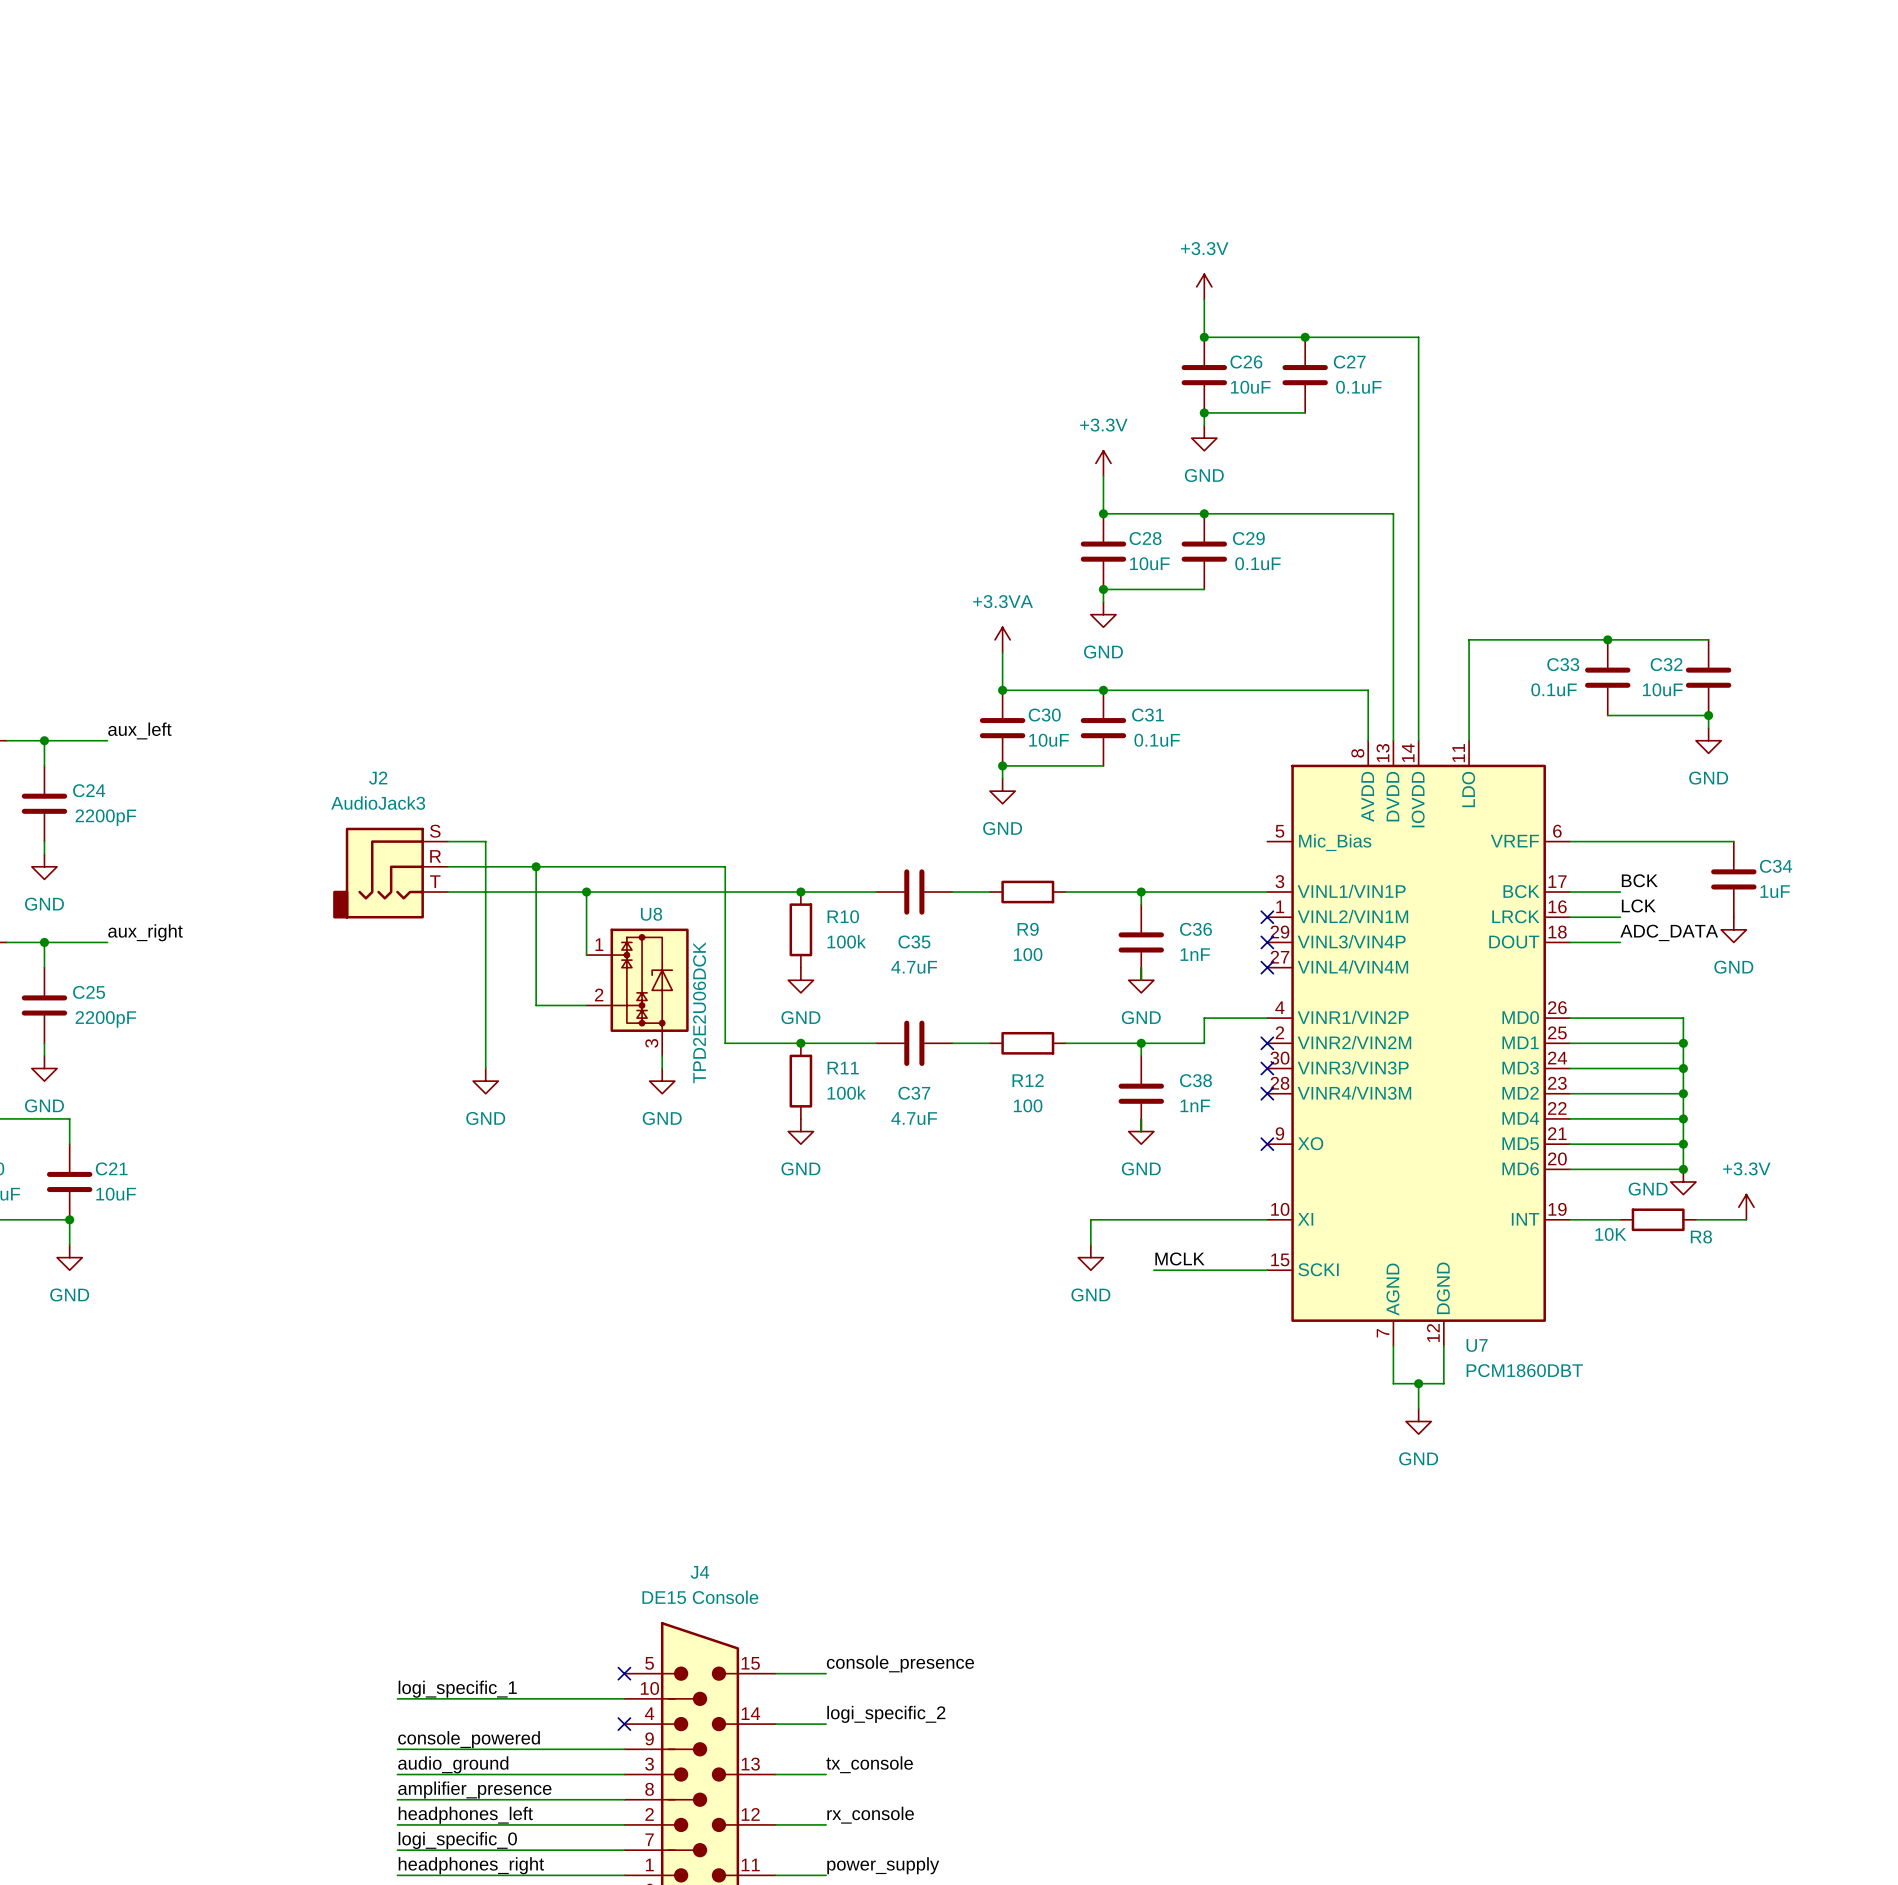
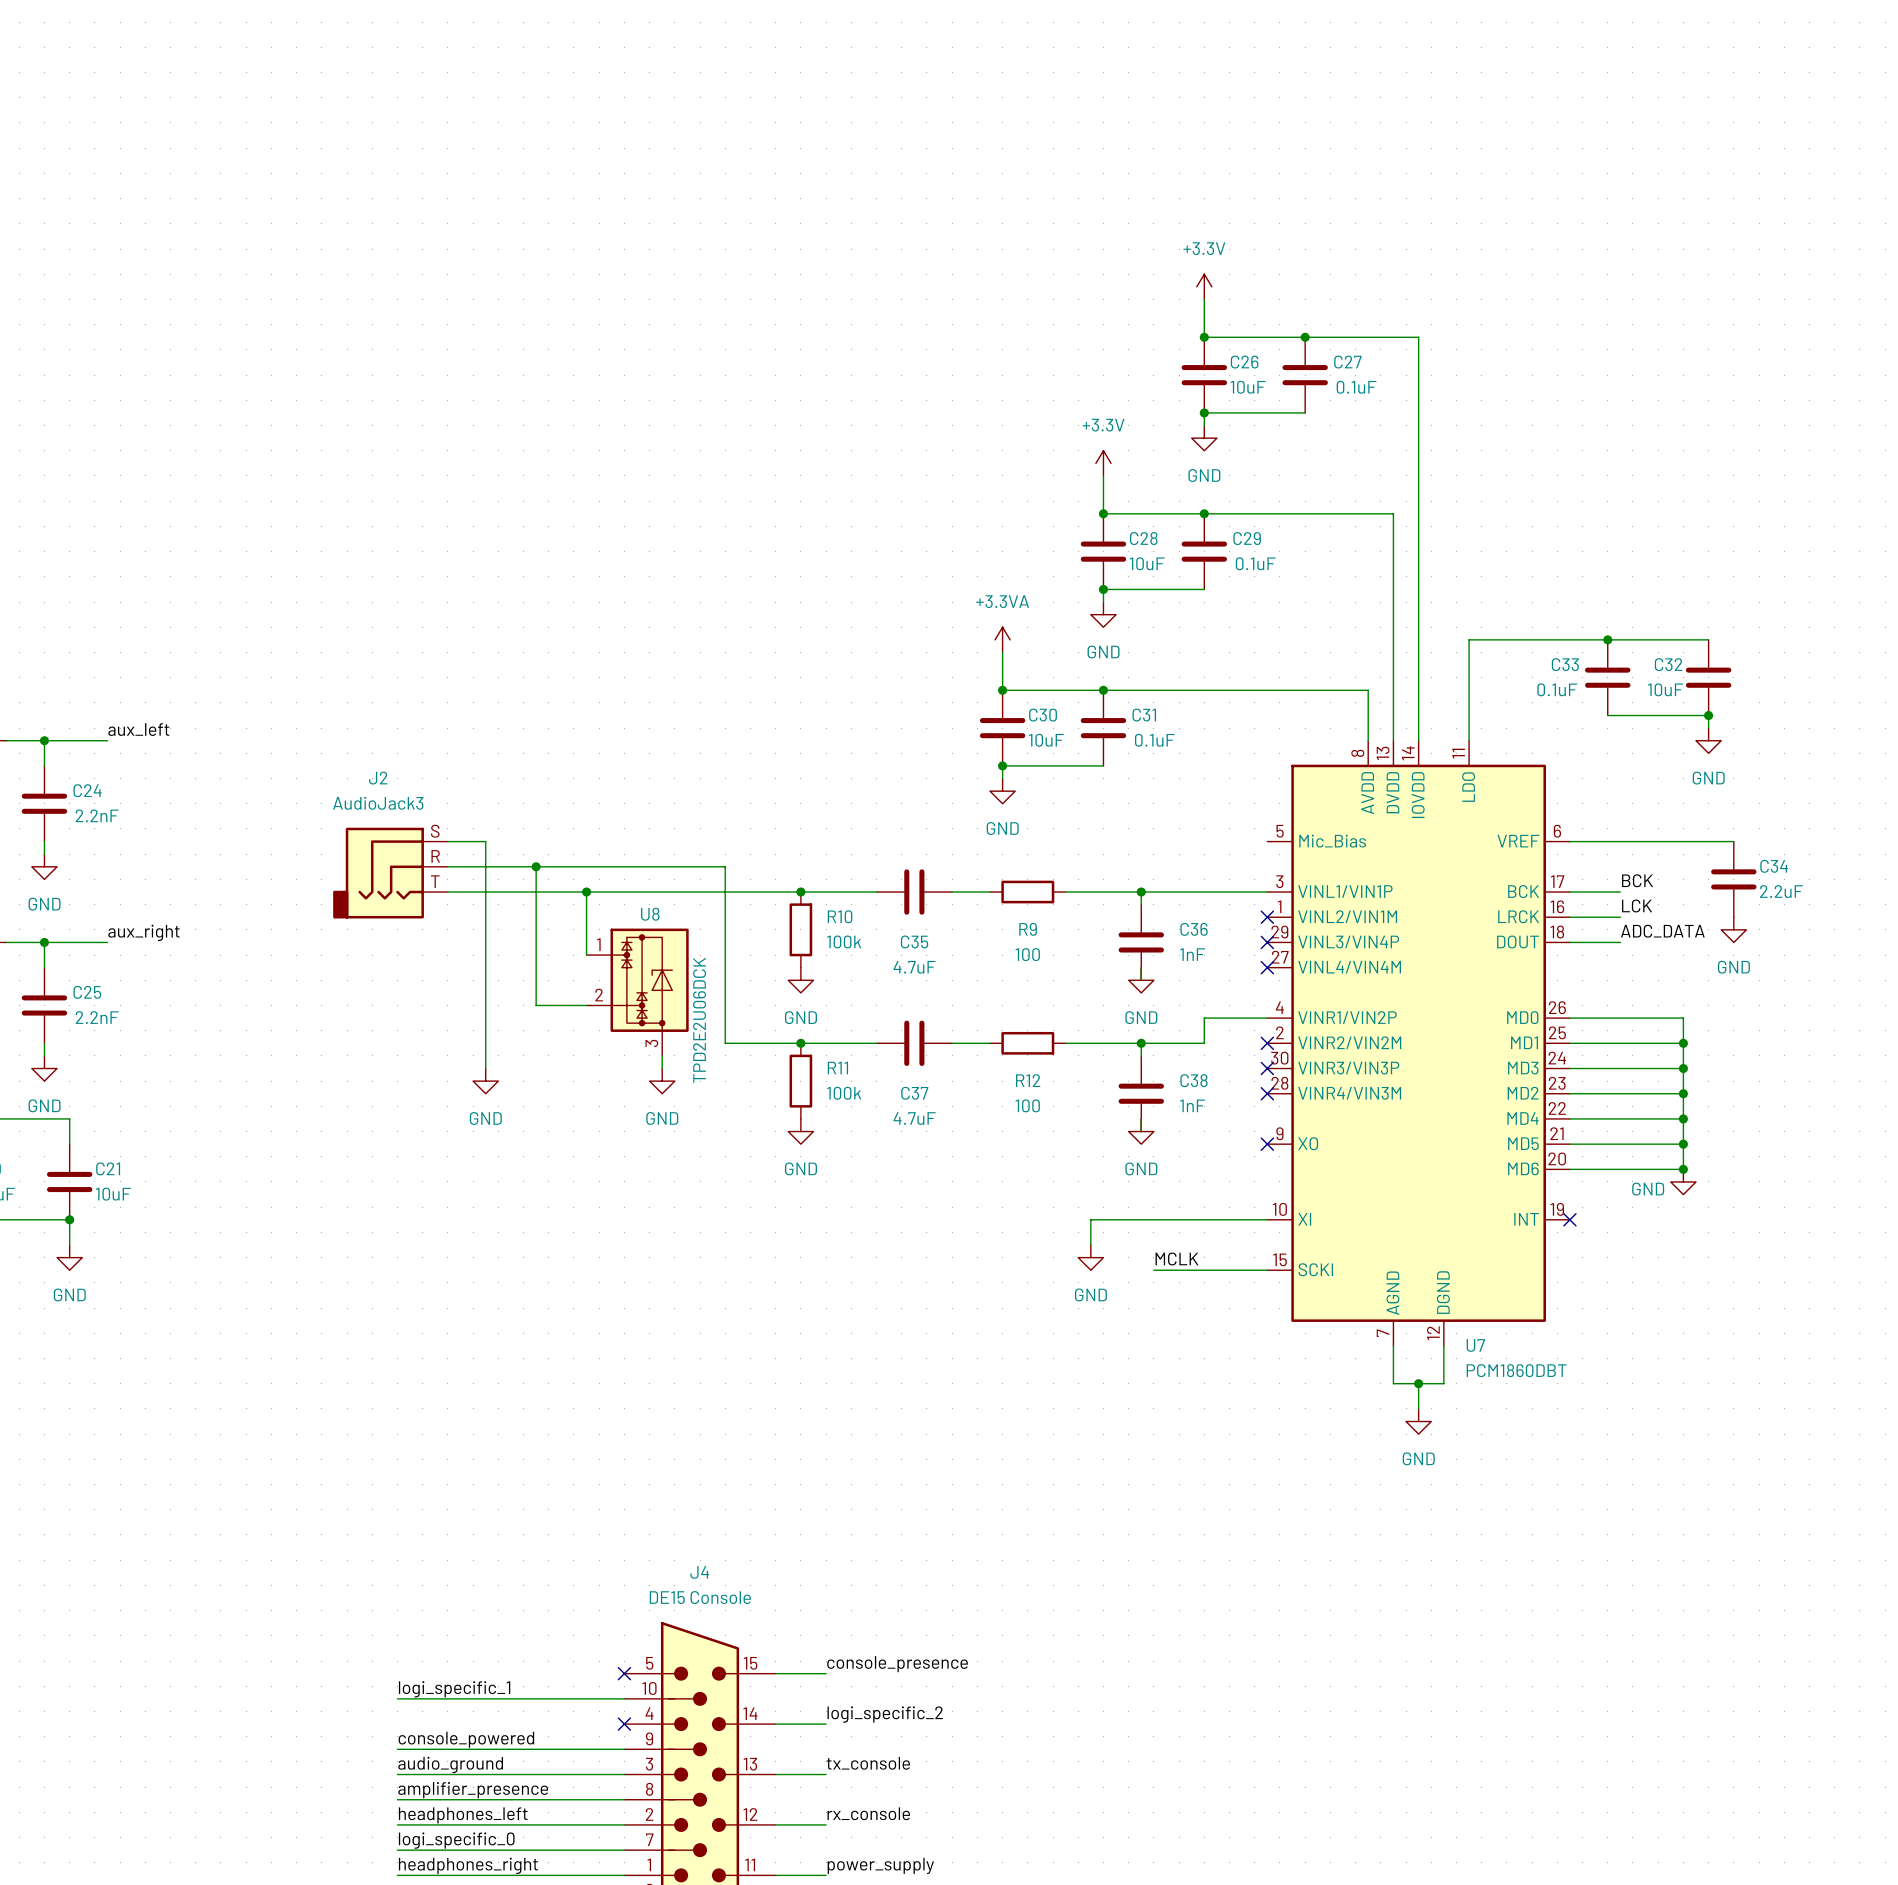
C24 value: 2200pF (105, 817) -> 2.2nF (97, 815)
C34 value: 1uF (1775, 891) -> 2.2uF (1781, 891)
C25 value: 2200pF (105, 1019) -> 2.2nF (97, 1017)
power symbol: +3.3V (1746, 1207) -> none
wire: (1569, 1219) (1620, 1219) -> none
no-connect mark: none -> (1569, 1219)
R8: 10K (1658, 1219) -> none
wire: (1695, 1219) (1746, 1219) -> none

